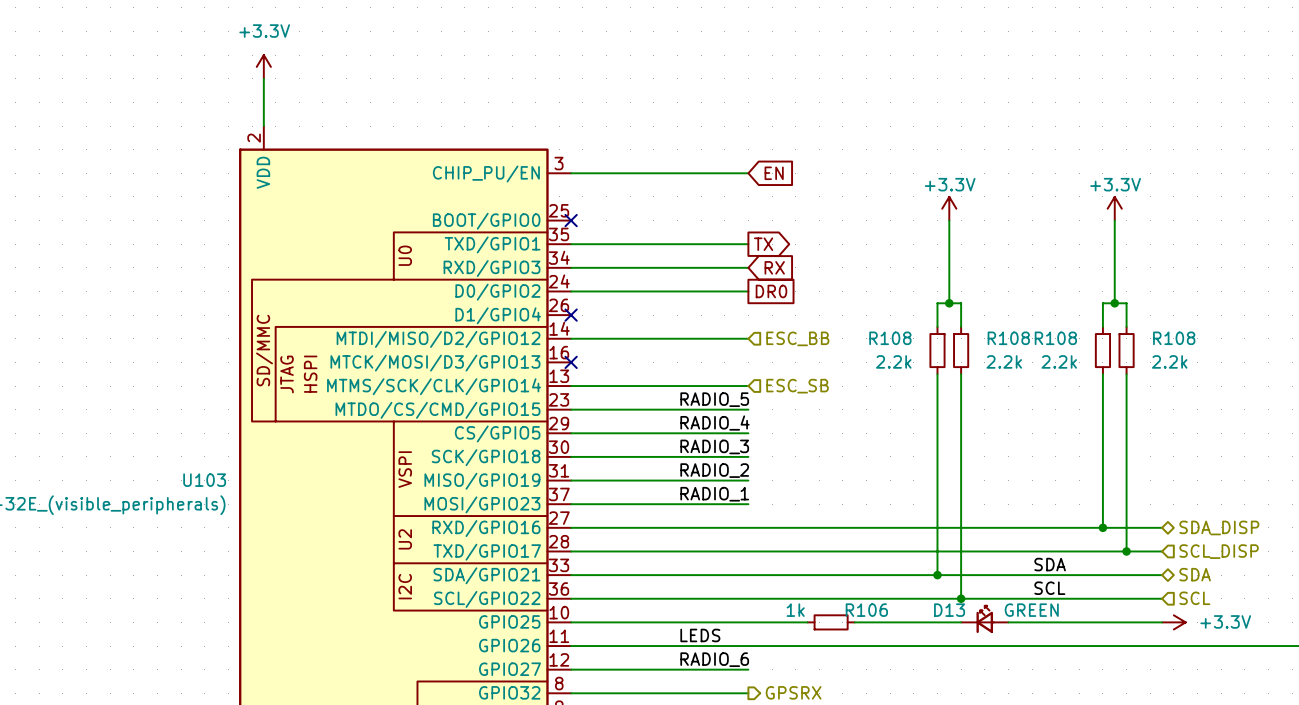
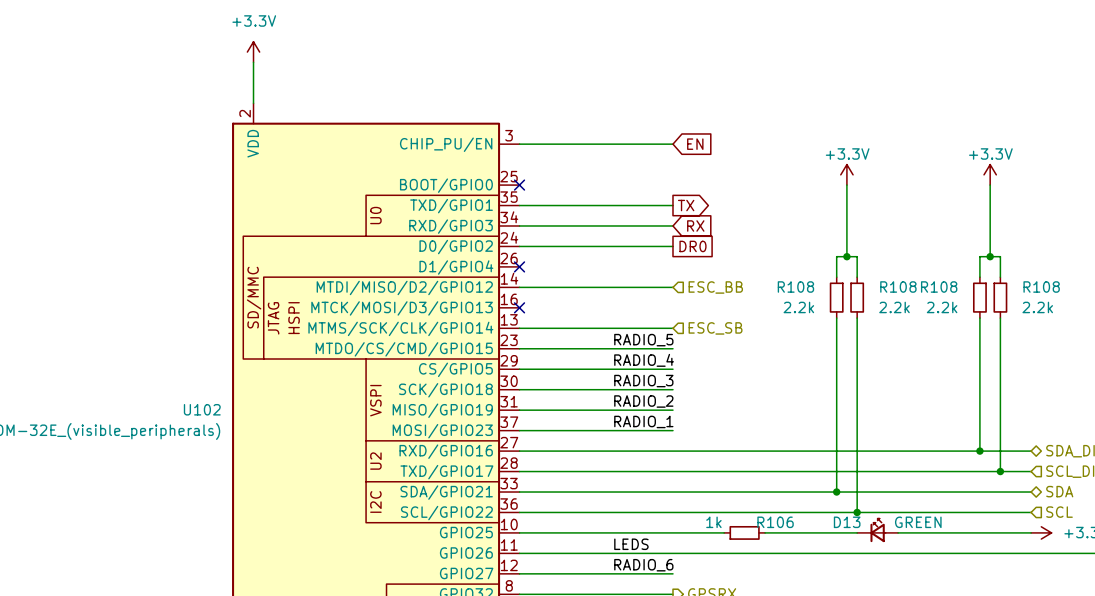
U103 name: U103 (204, 480) -> U102 (202, 409)
label: SDA (1050, 564) -> none
label: SCL (1049, 588) -> none

